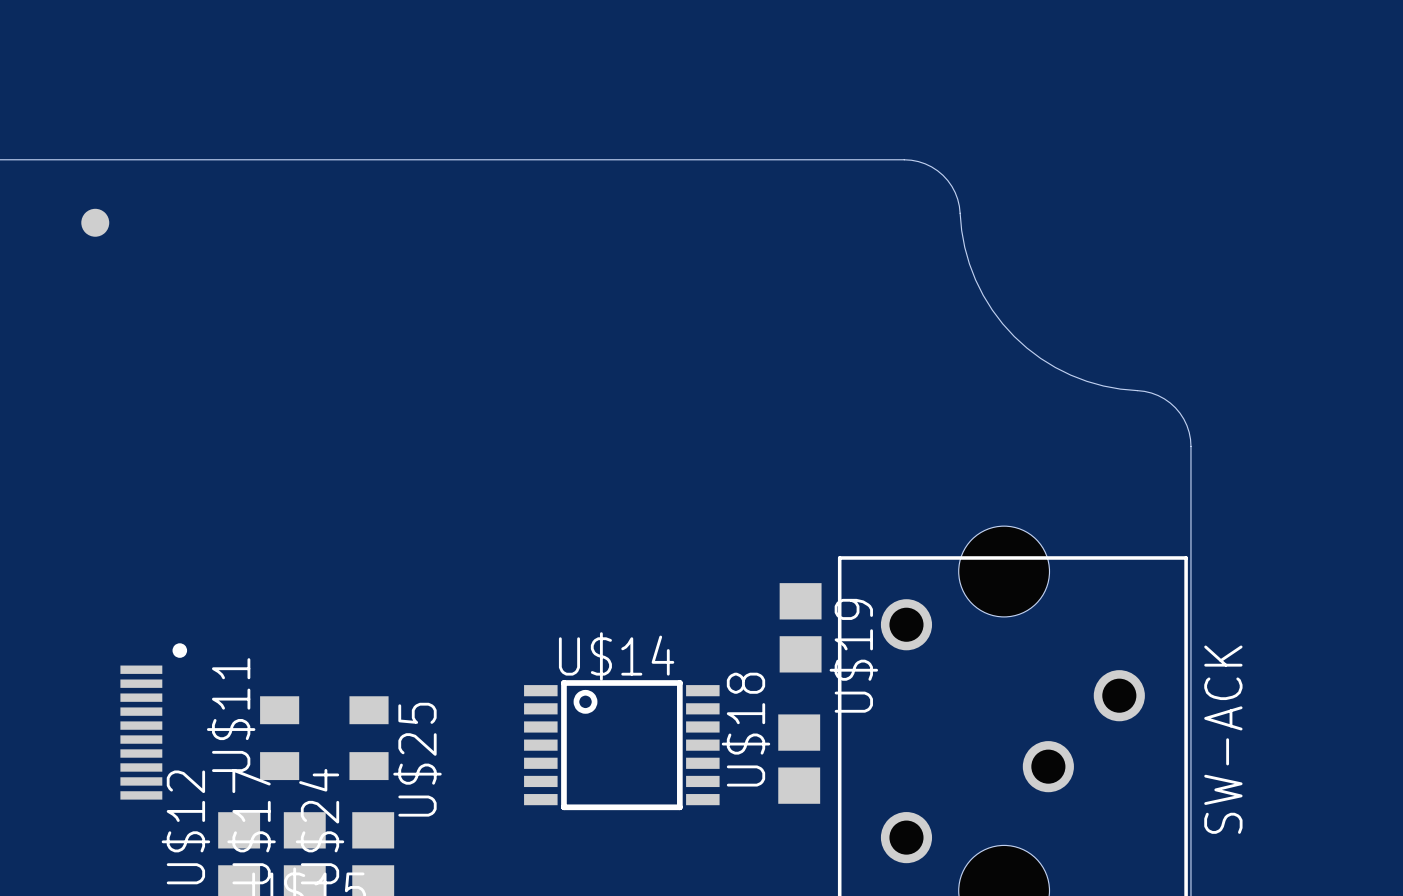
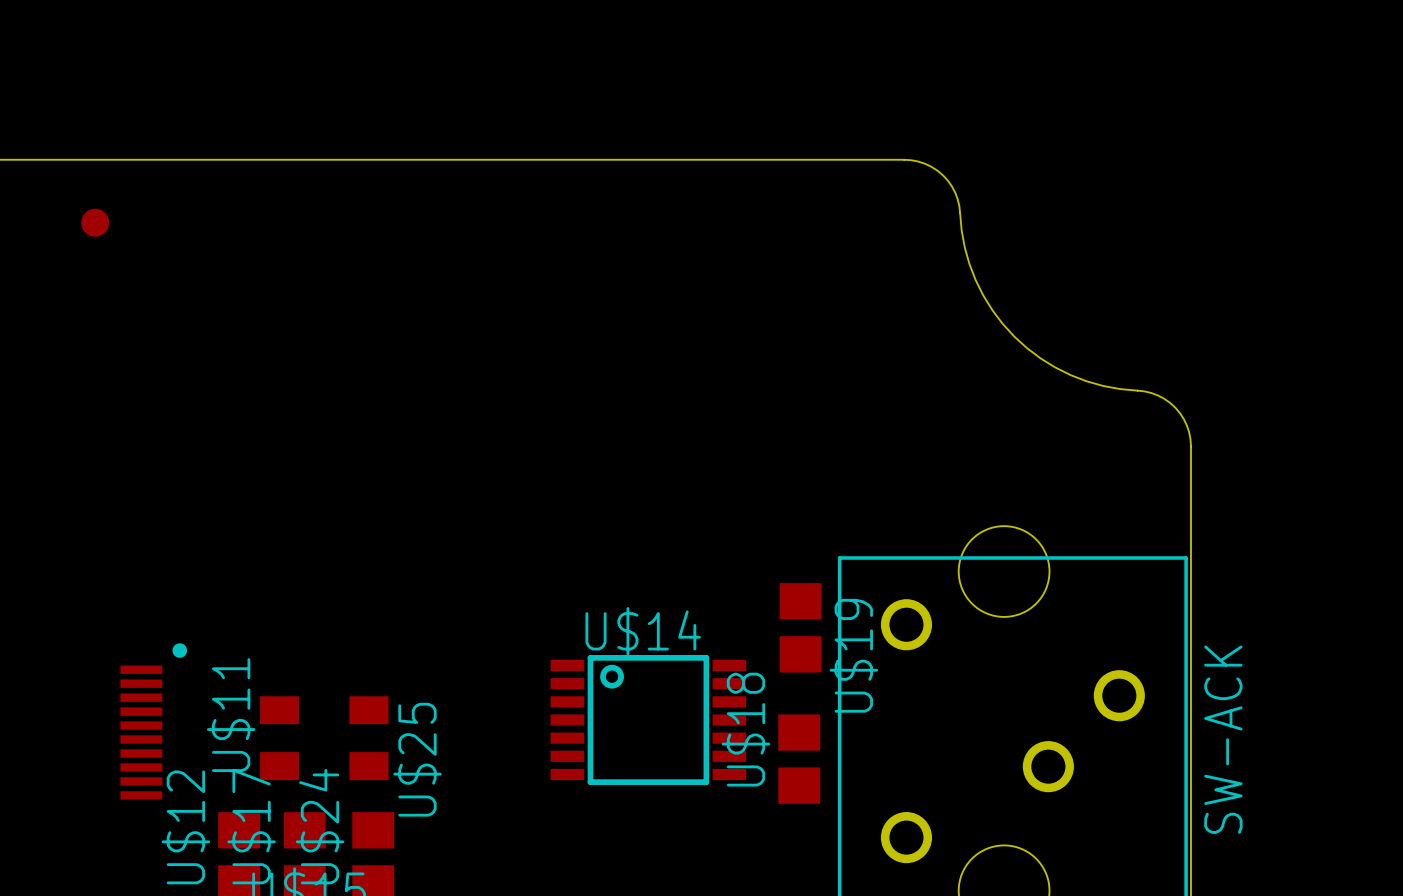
U$14 position: (621, 745) -> (648, 720)

